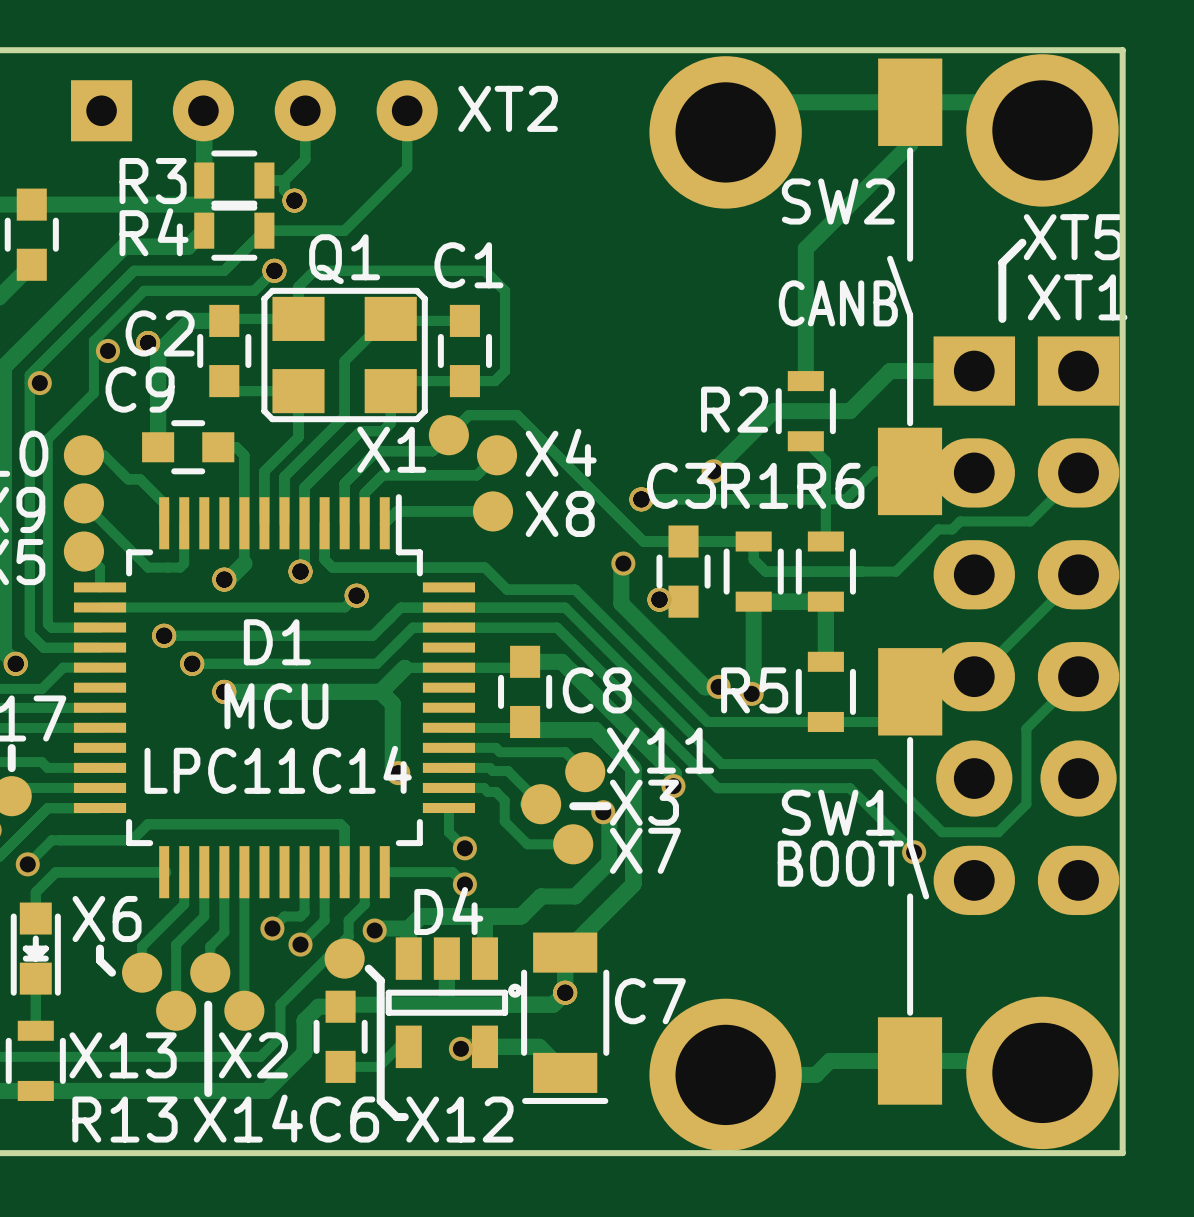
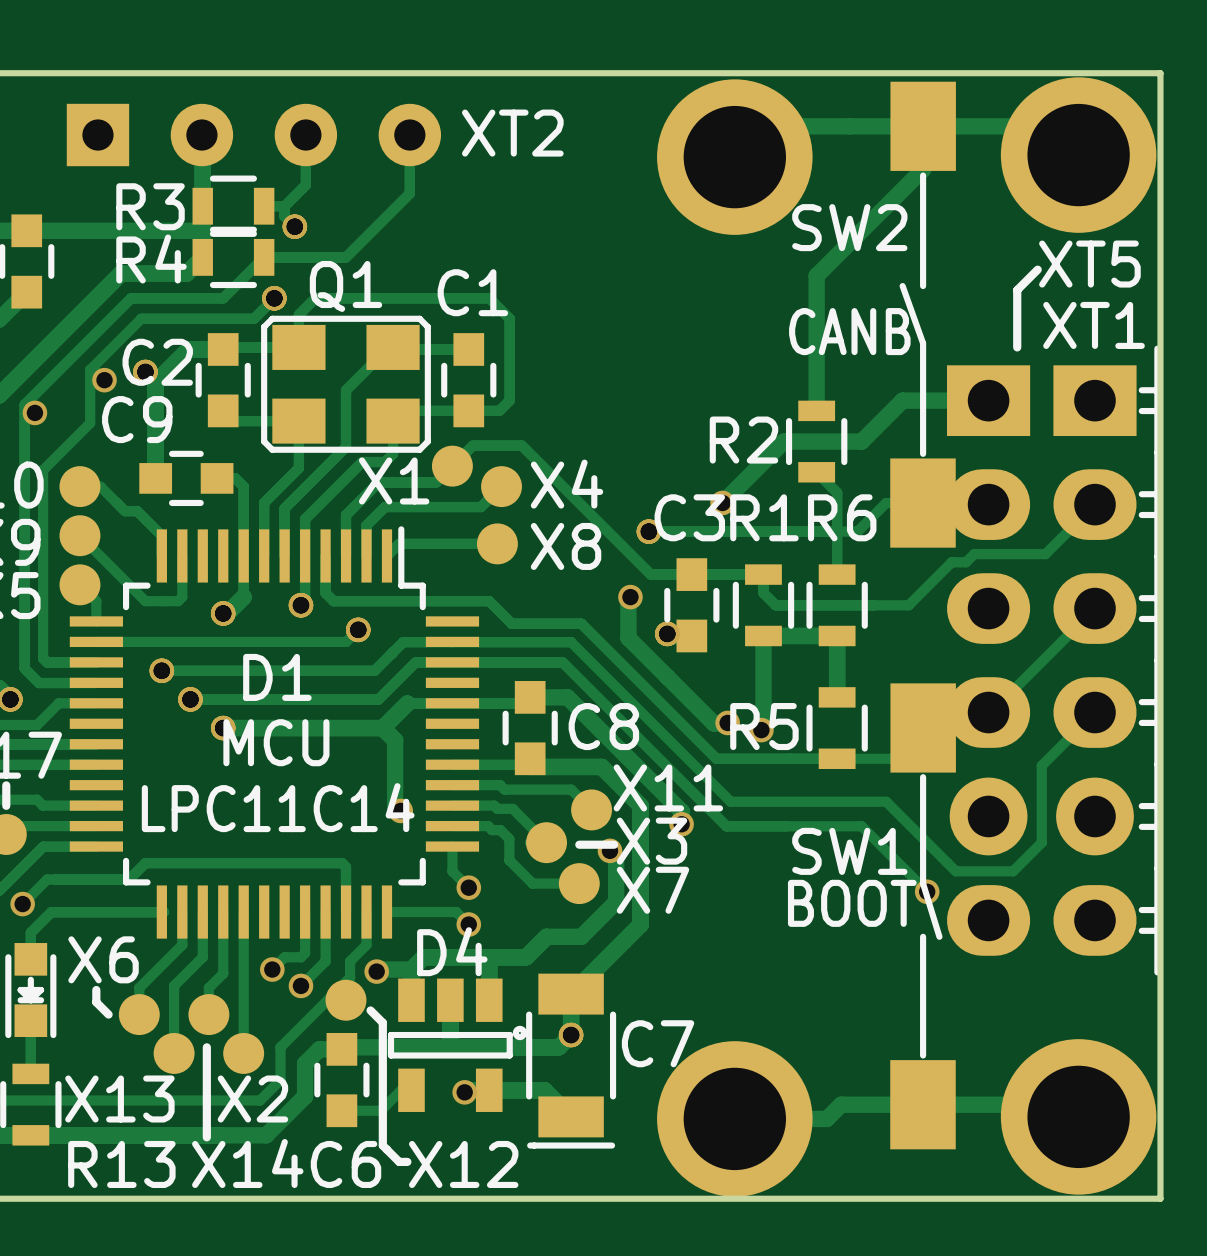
board edge: (1122, 50) (1122, 1153) -> (1140, 73) (1160, 73) (1160, 1198) (1140, 1198)
part position: (1042, 130) -> (1078, 155)
XT1 footprint: [1037, 336, 1120, 916] -> [1053, 345, 1161, 976]
part position: (1042, 1072) -> (1078, 1116)

